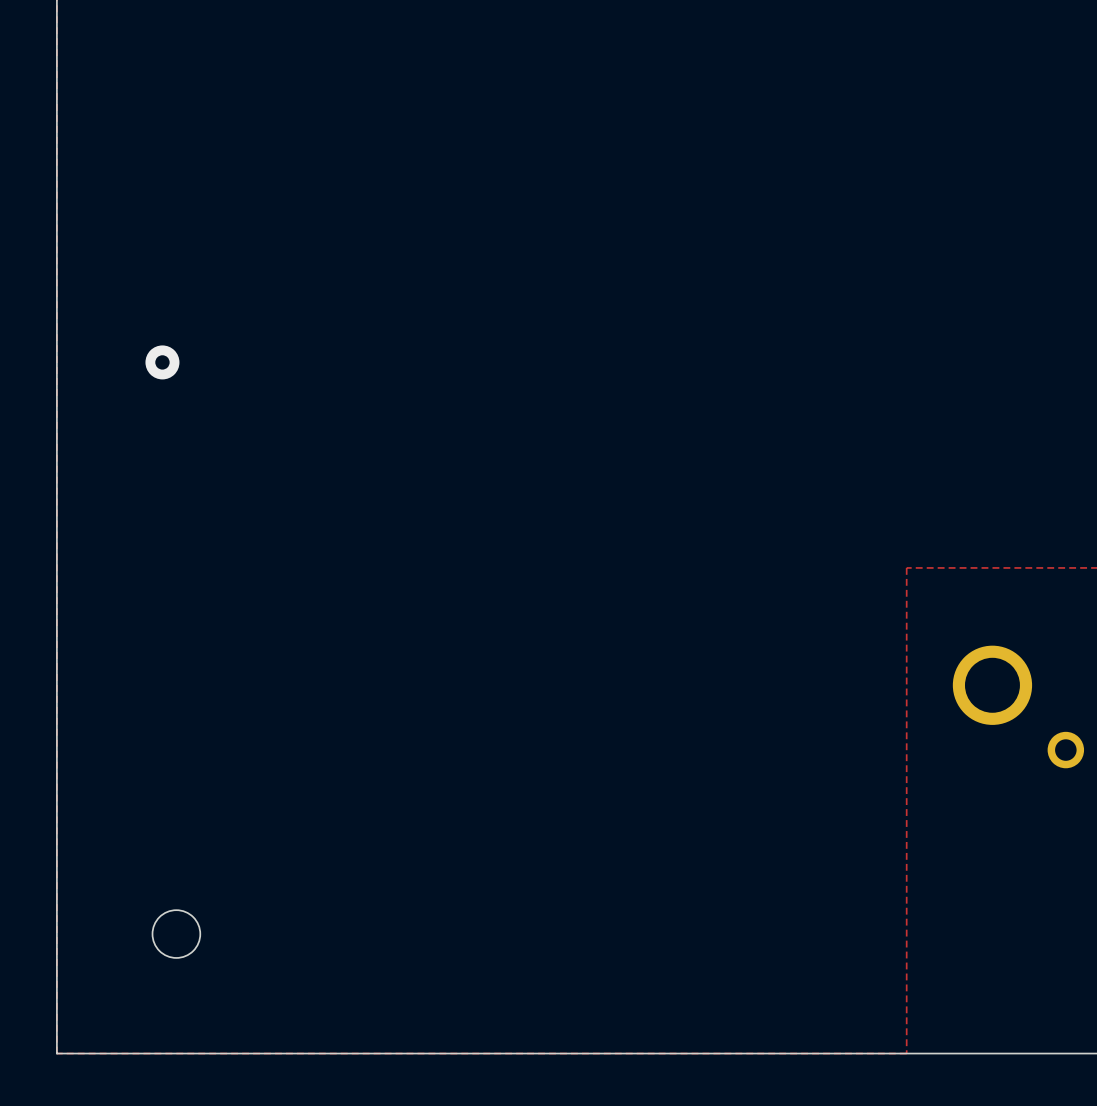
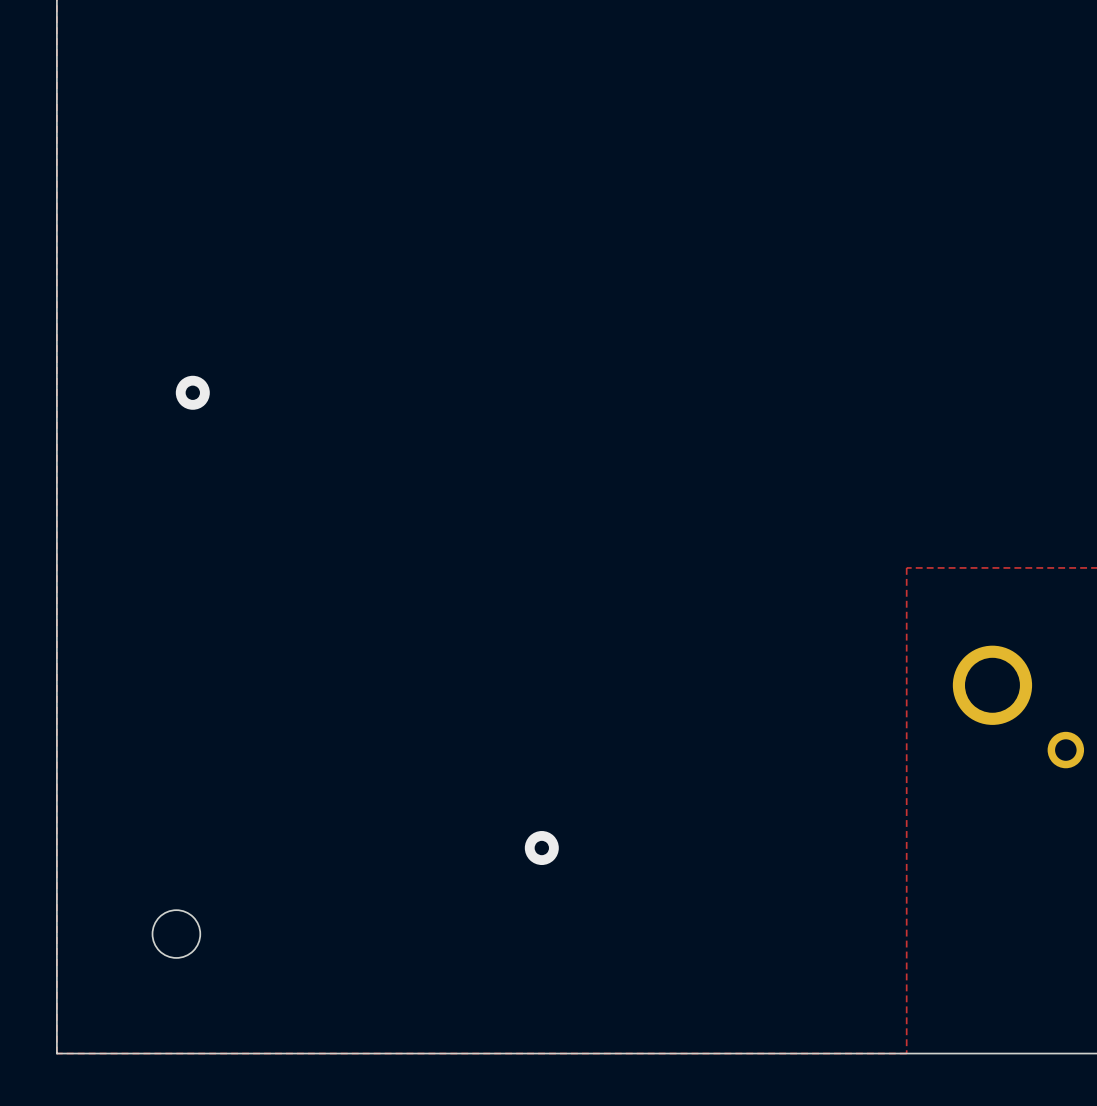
via position: (162, 362) -> (192, 392)
via: none -> (541, 848)

